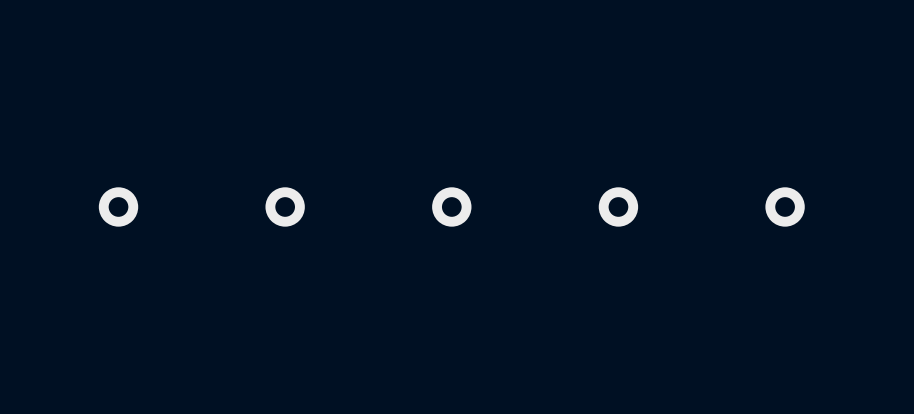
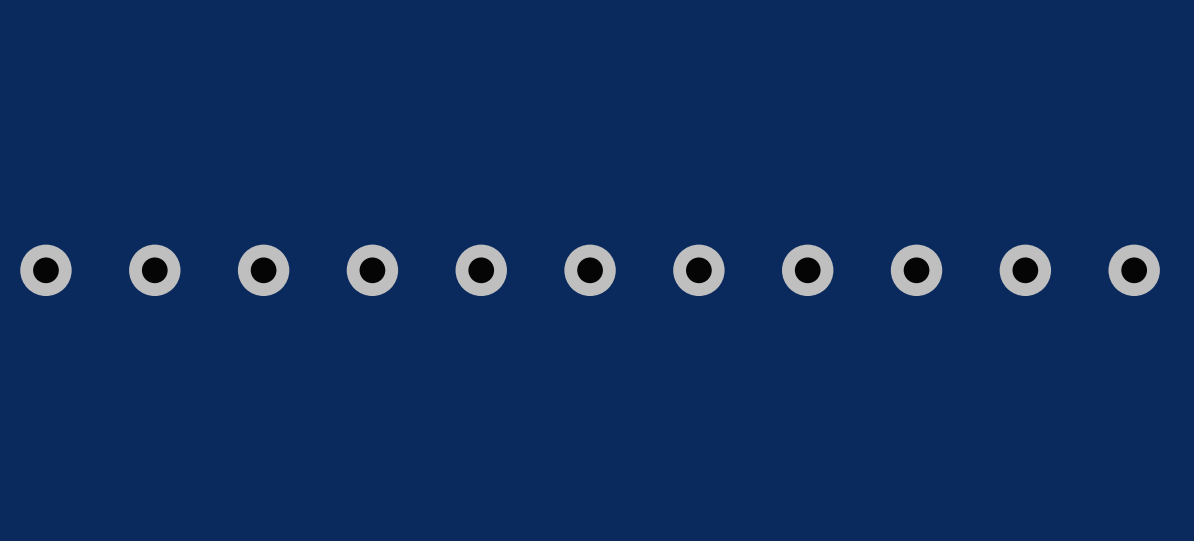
via: none -> (45, 270)
via: none -> (263, 270)
via: none -> (481, 270)
via: none -> (698, 270)
via: none -> (916, 270)
via: none -> (1134, 270)

